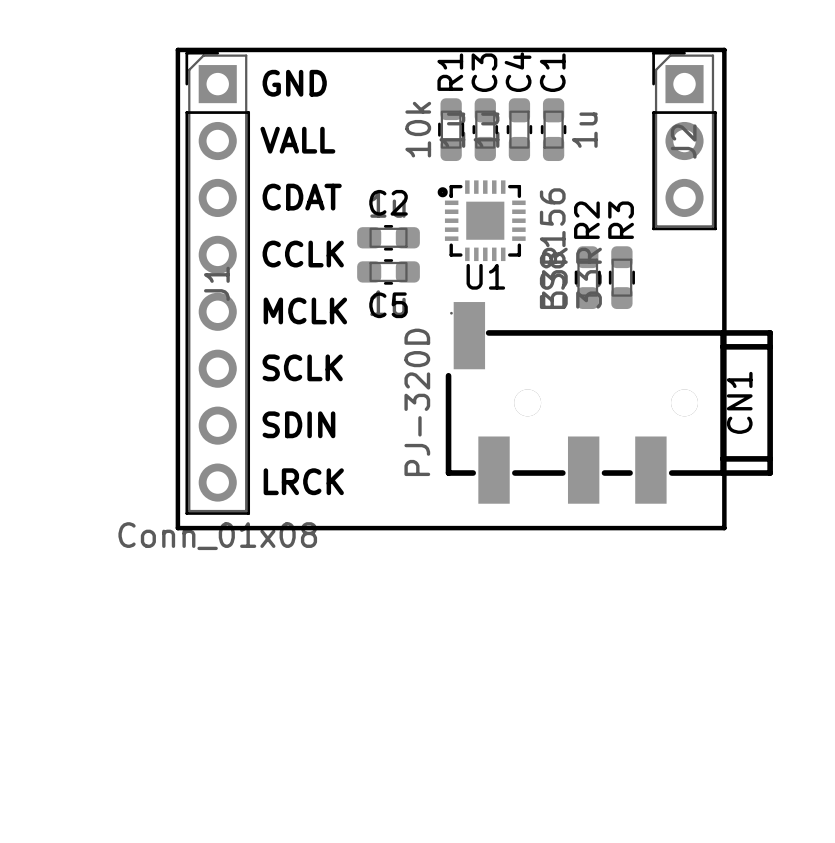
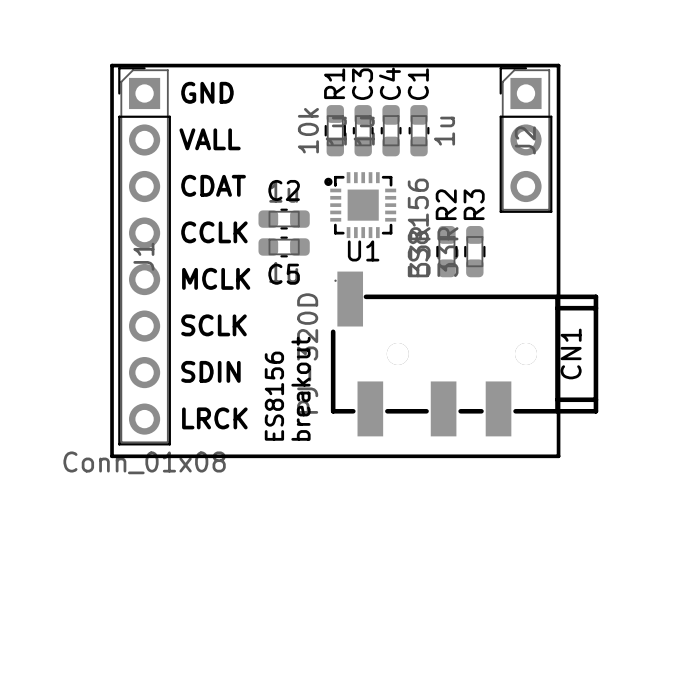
text: none -> breakout (300, 388)
text: none -> ES8156 (274, 396)

